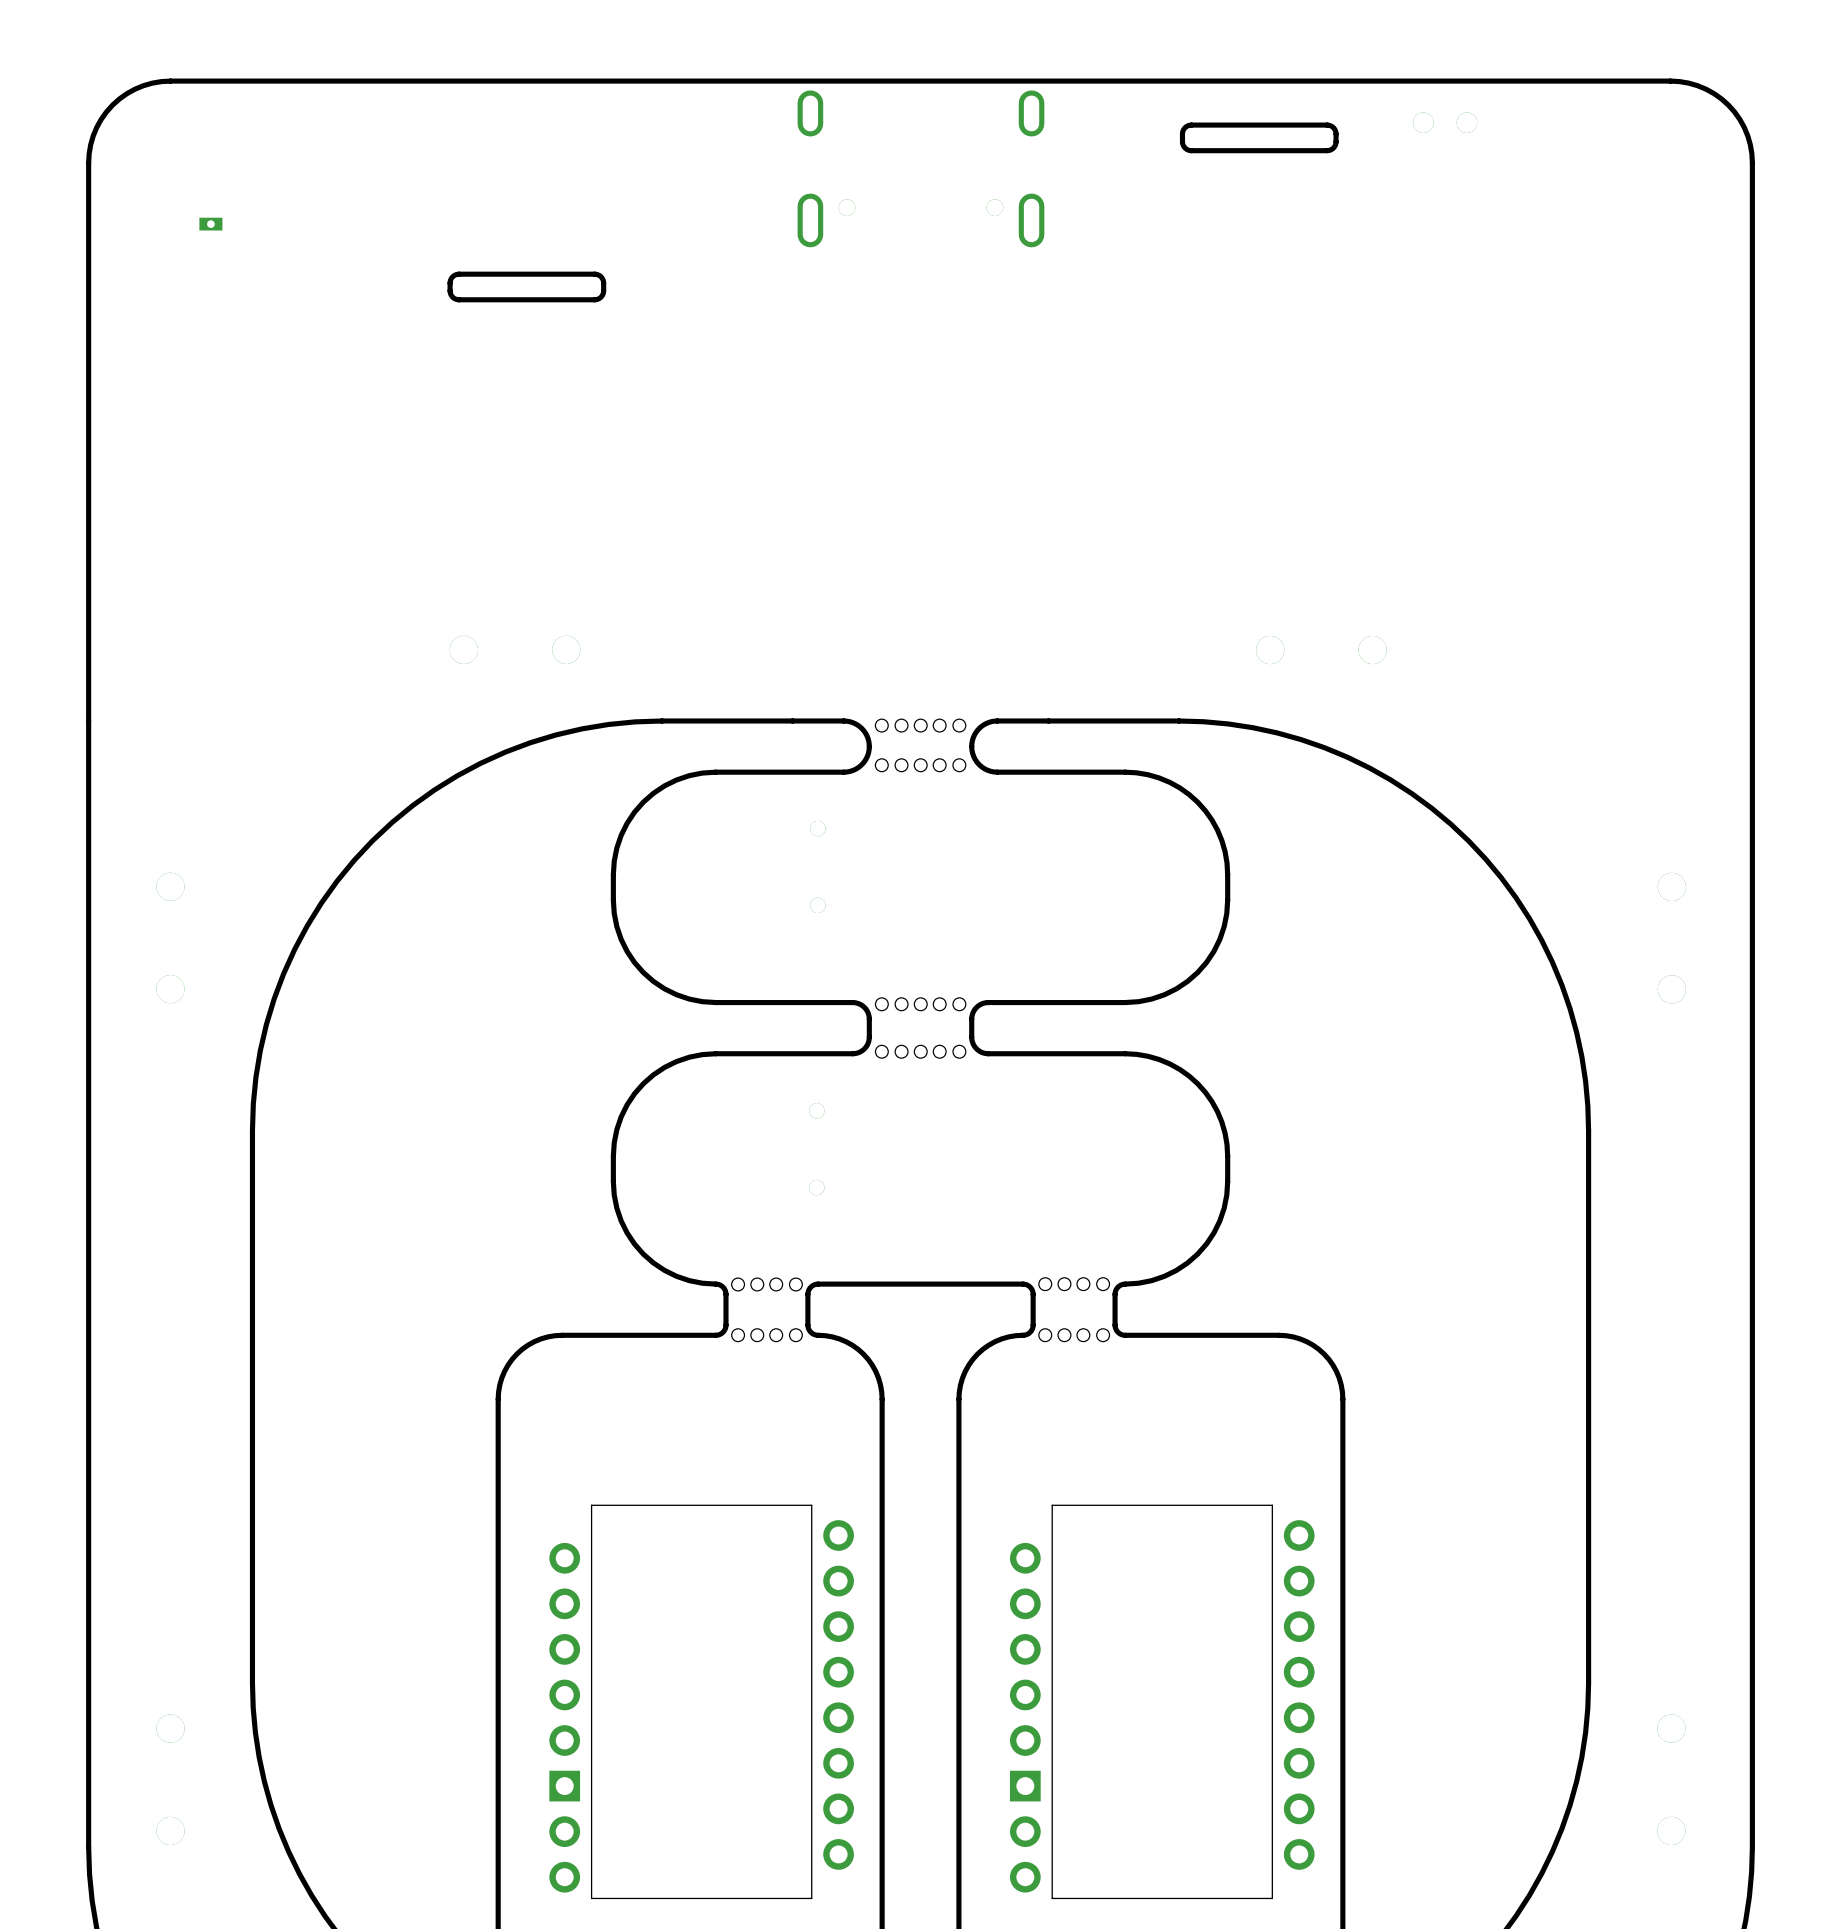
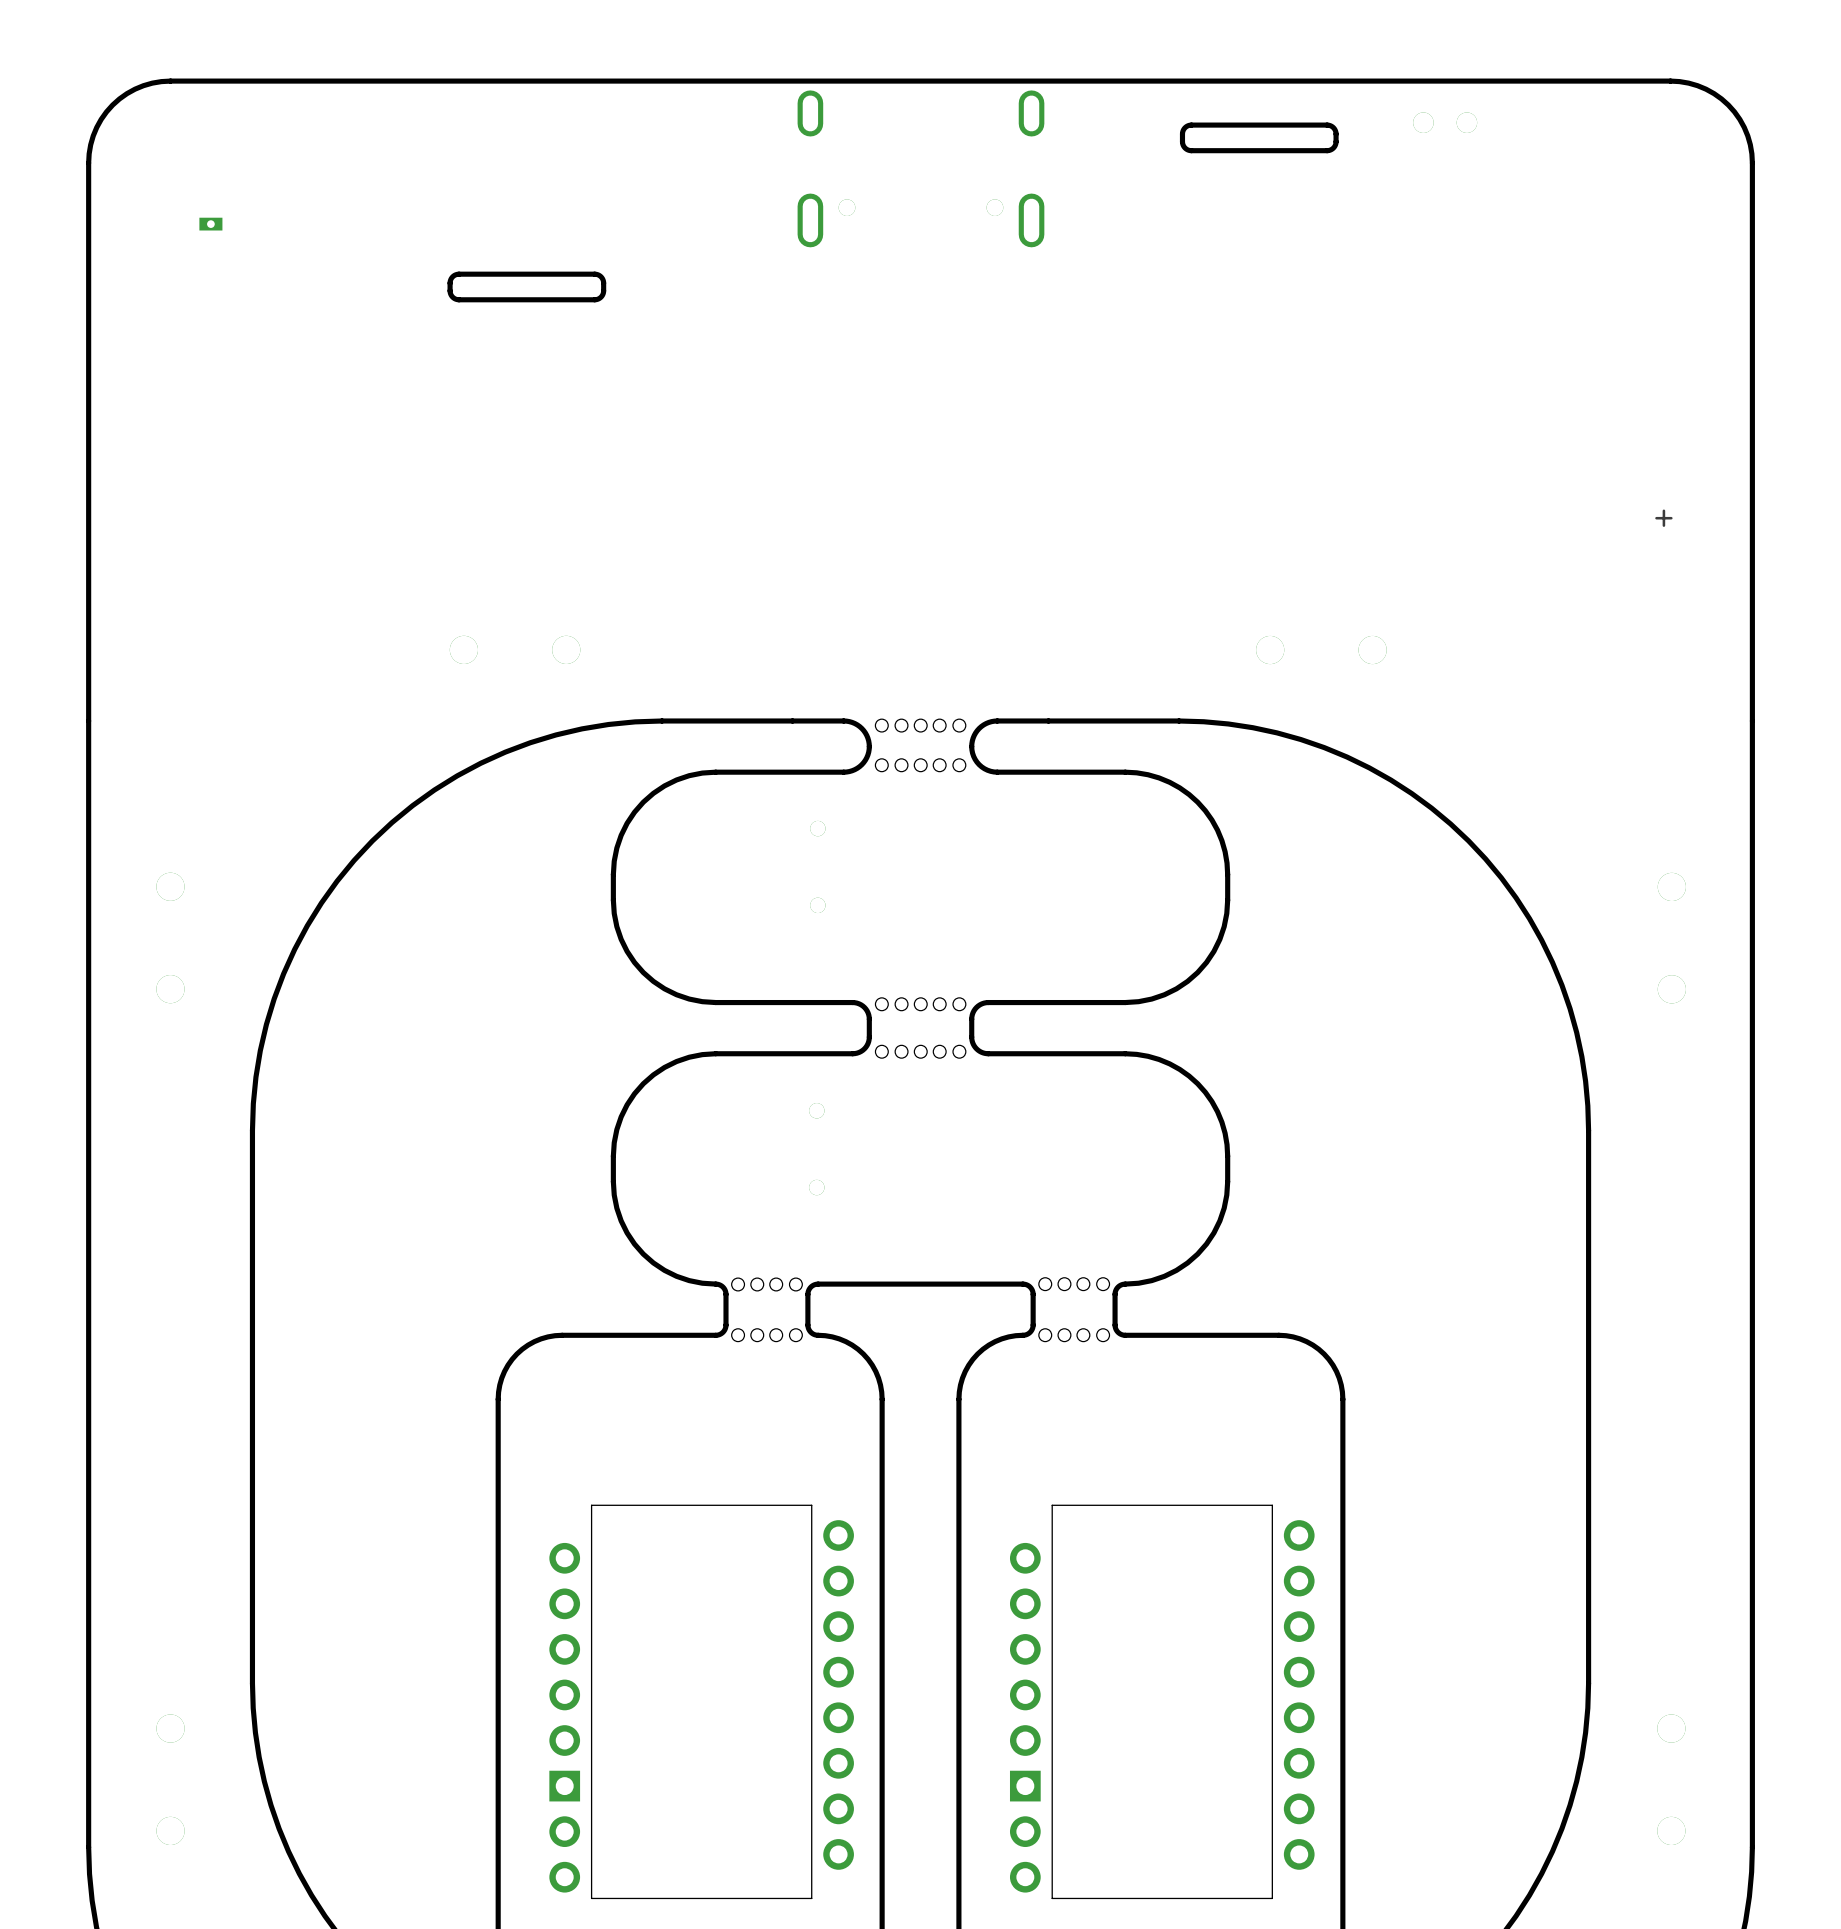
line: none -> (1663, 510) (1663, 525)
line: none -> (1671, 518) (1656, 518)

